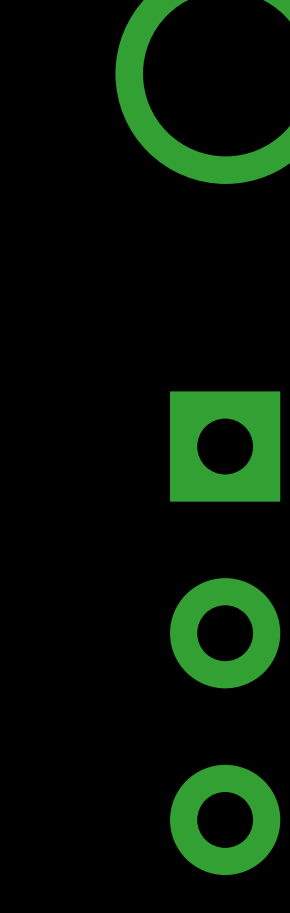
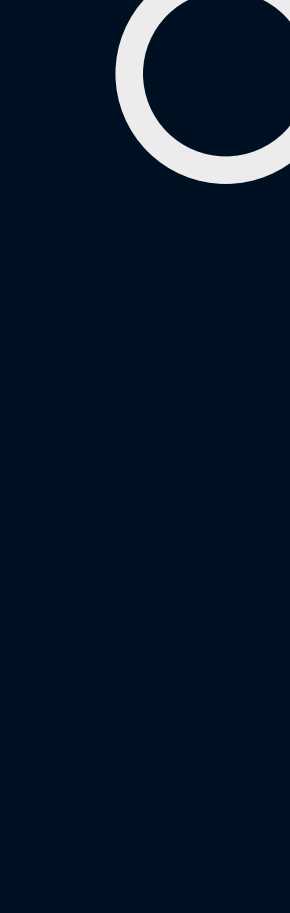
part: (225, 633) -> none

